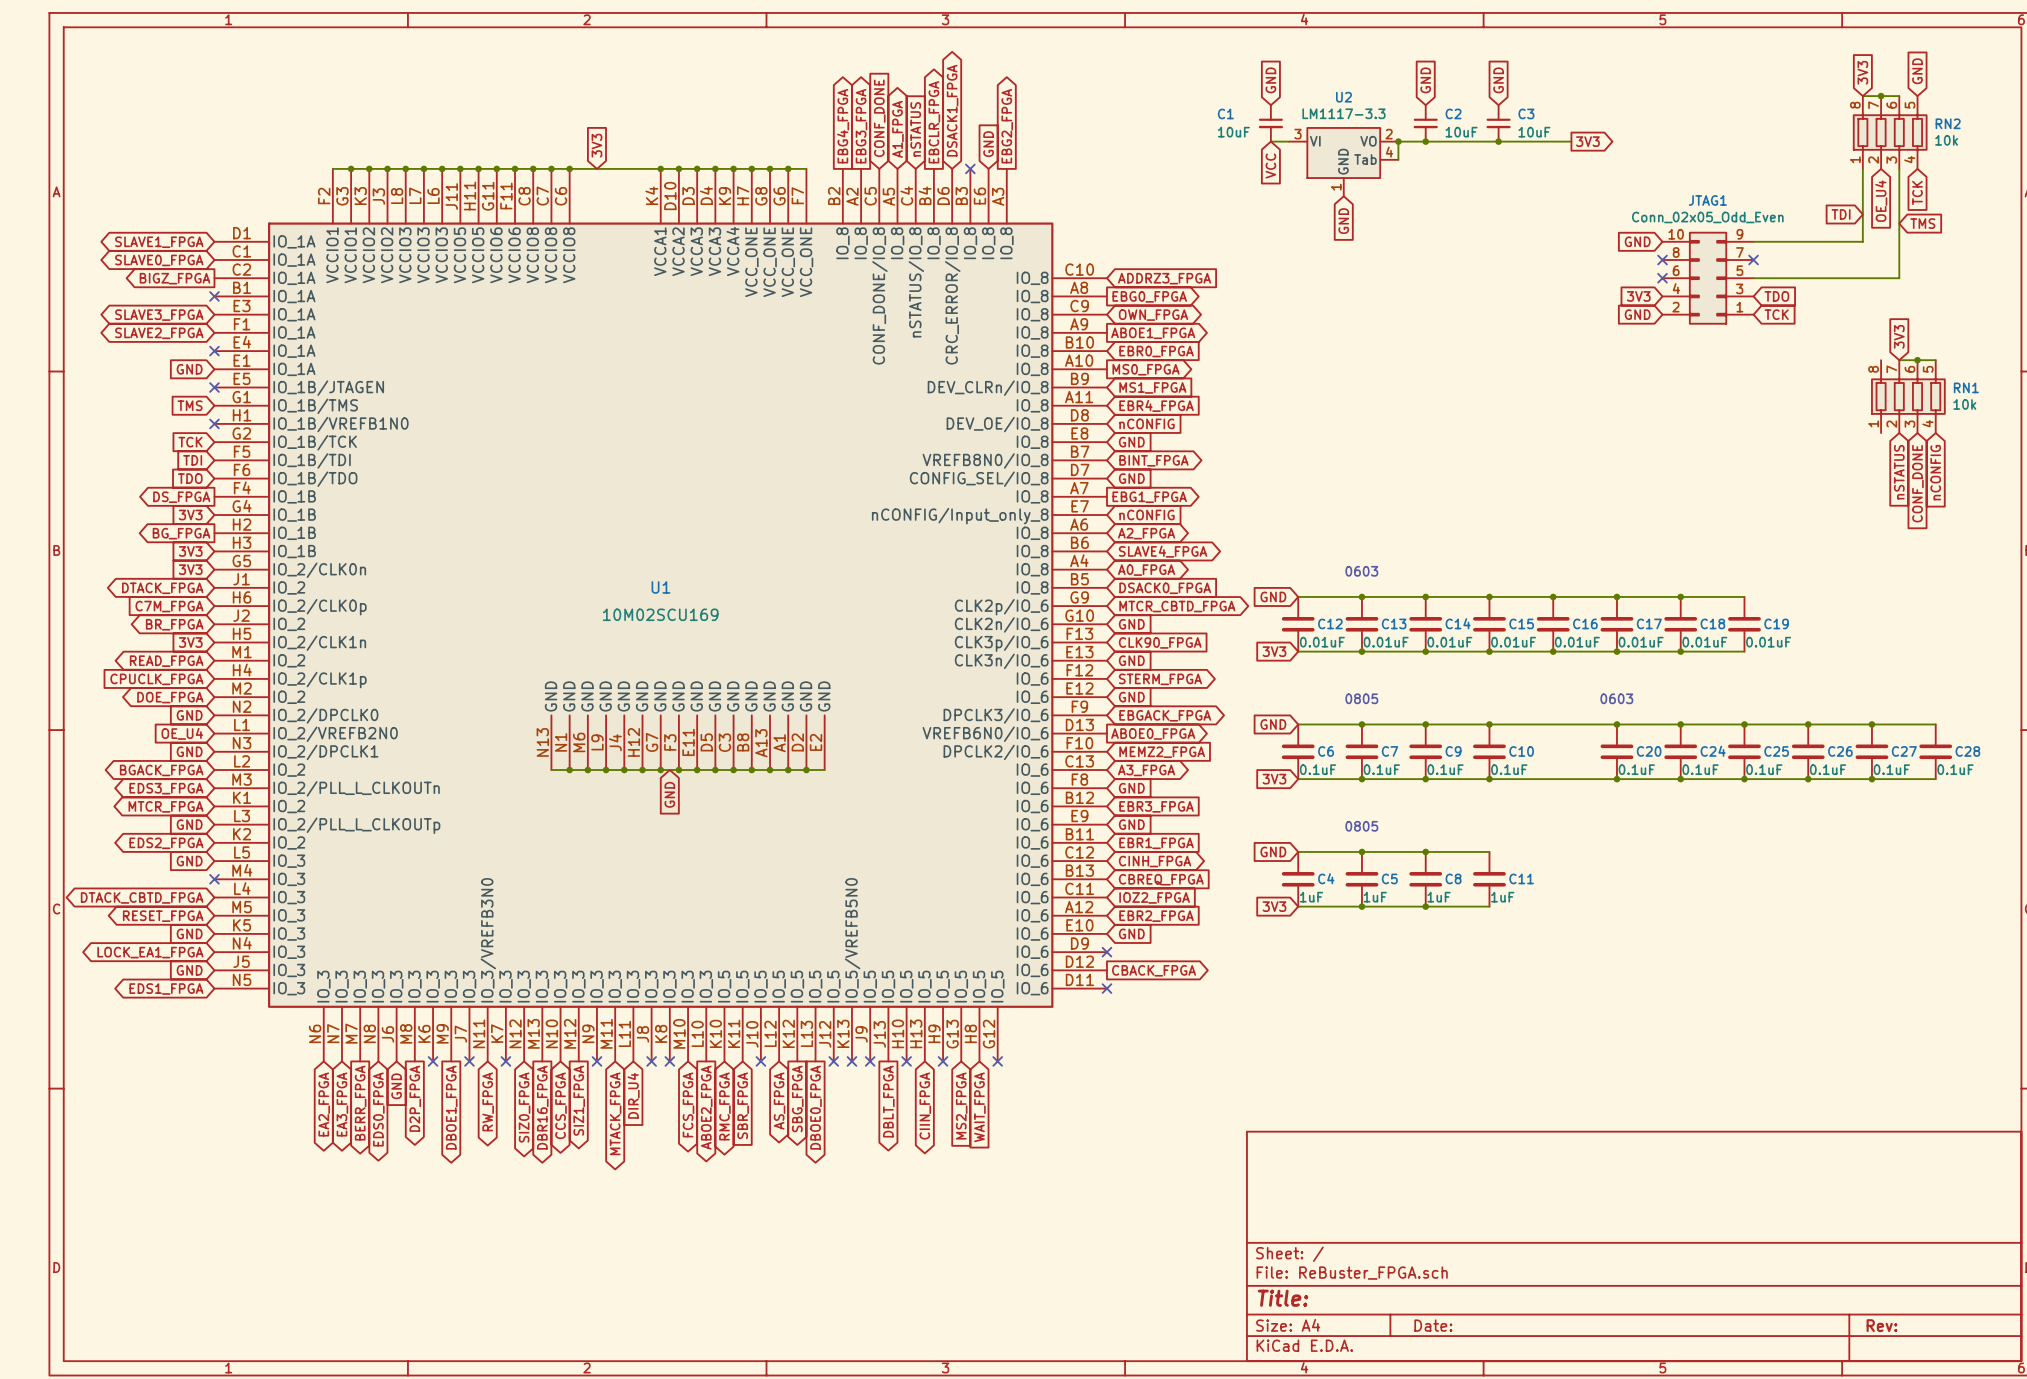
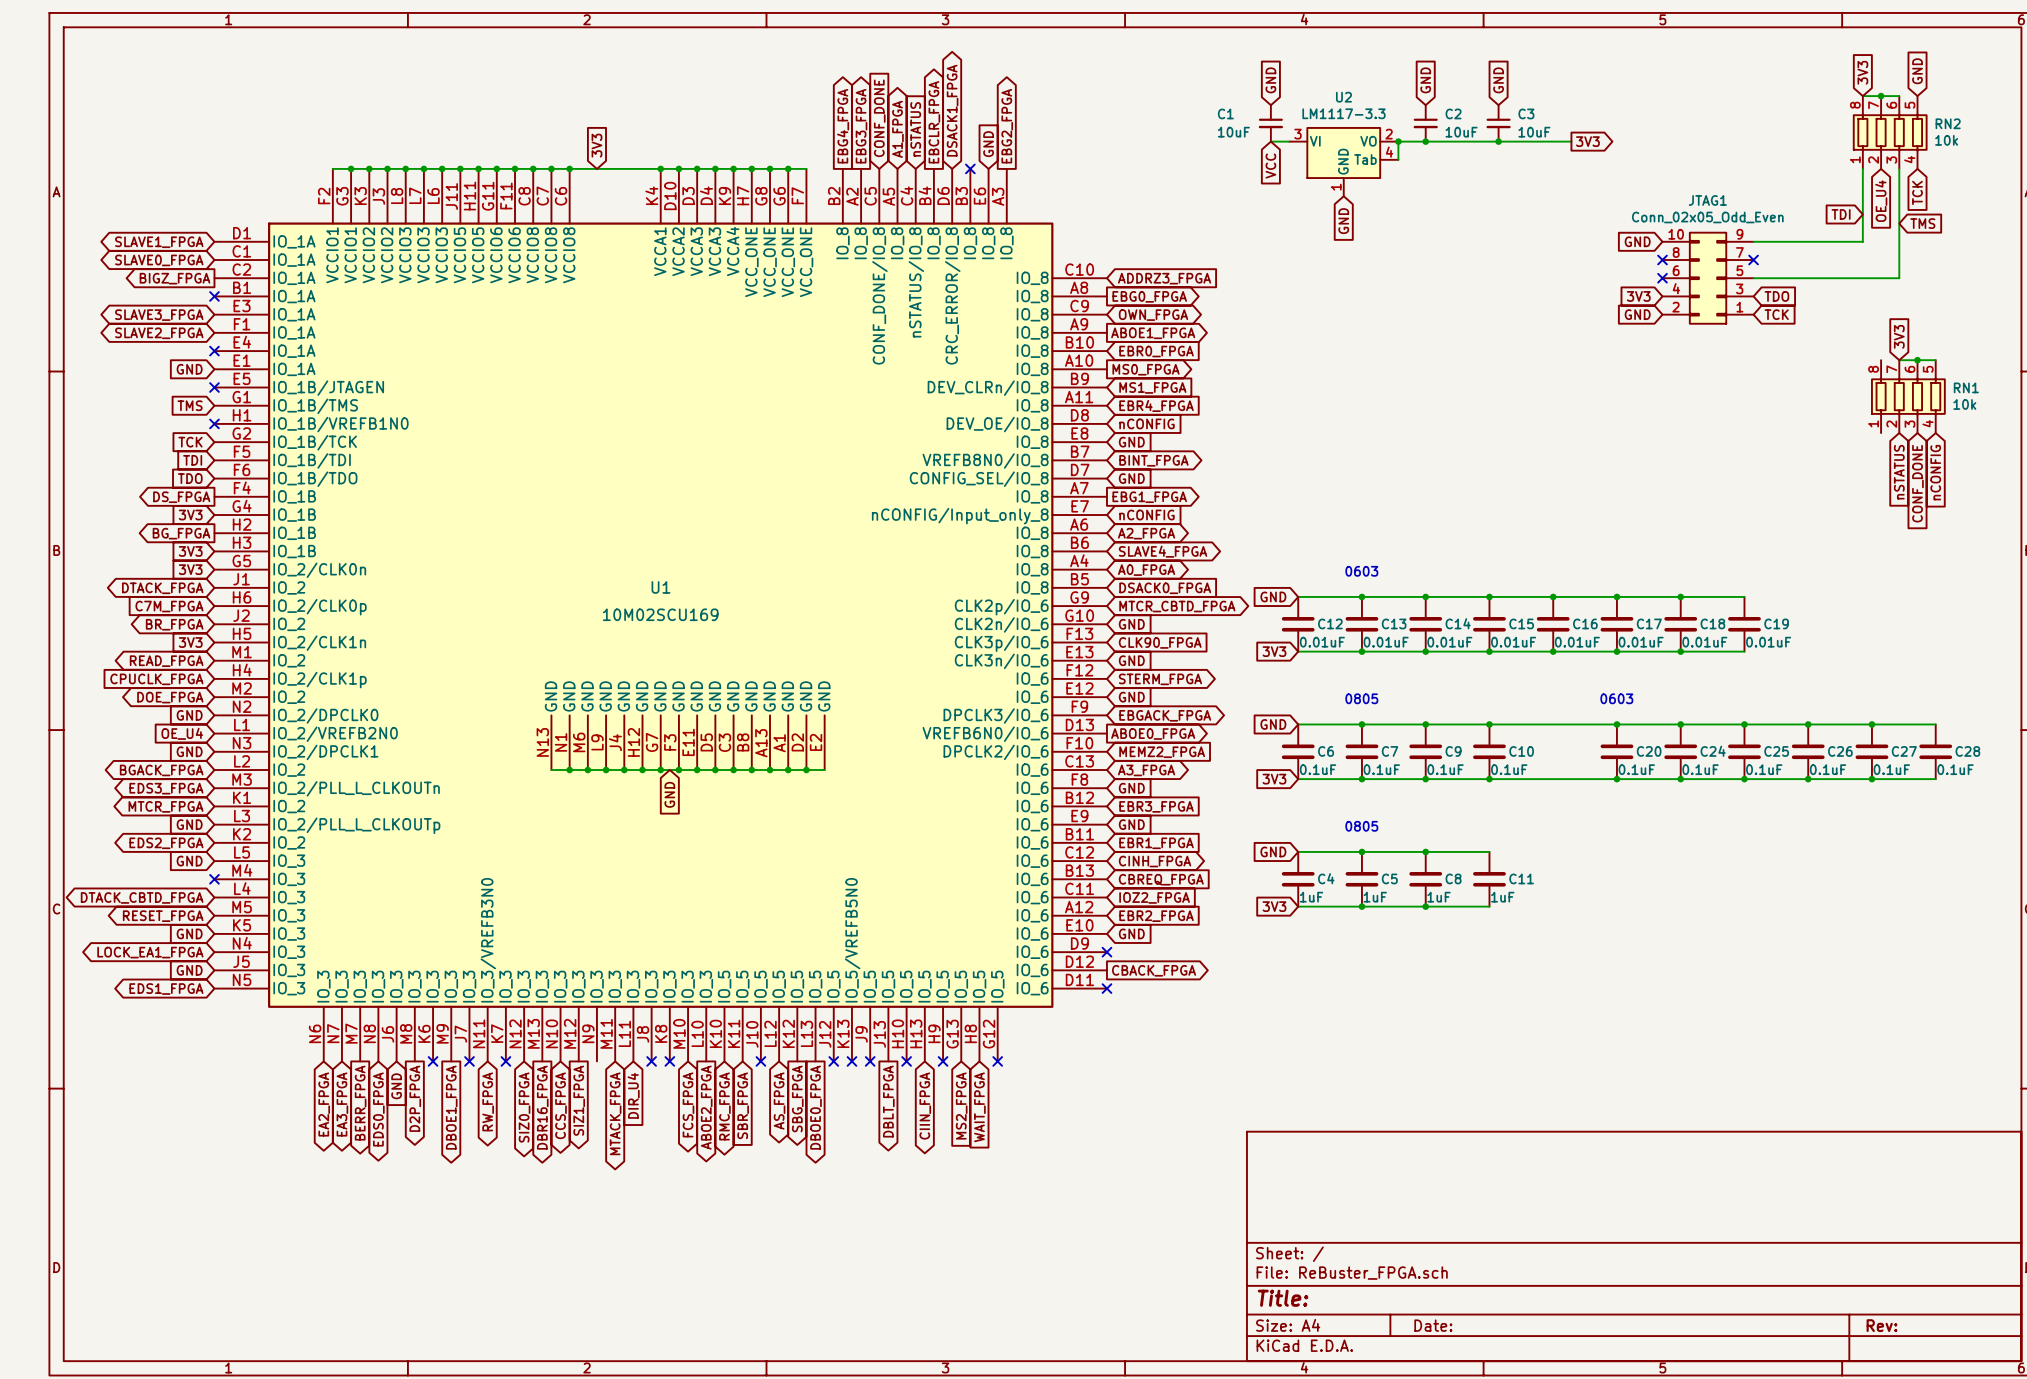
no-connect mark: (596, 1061) -> none

